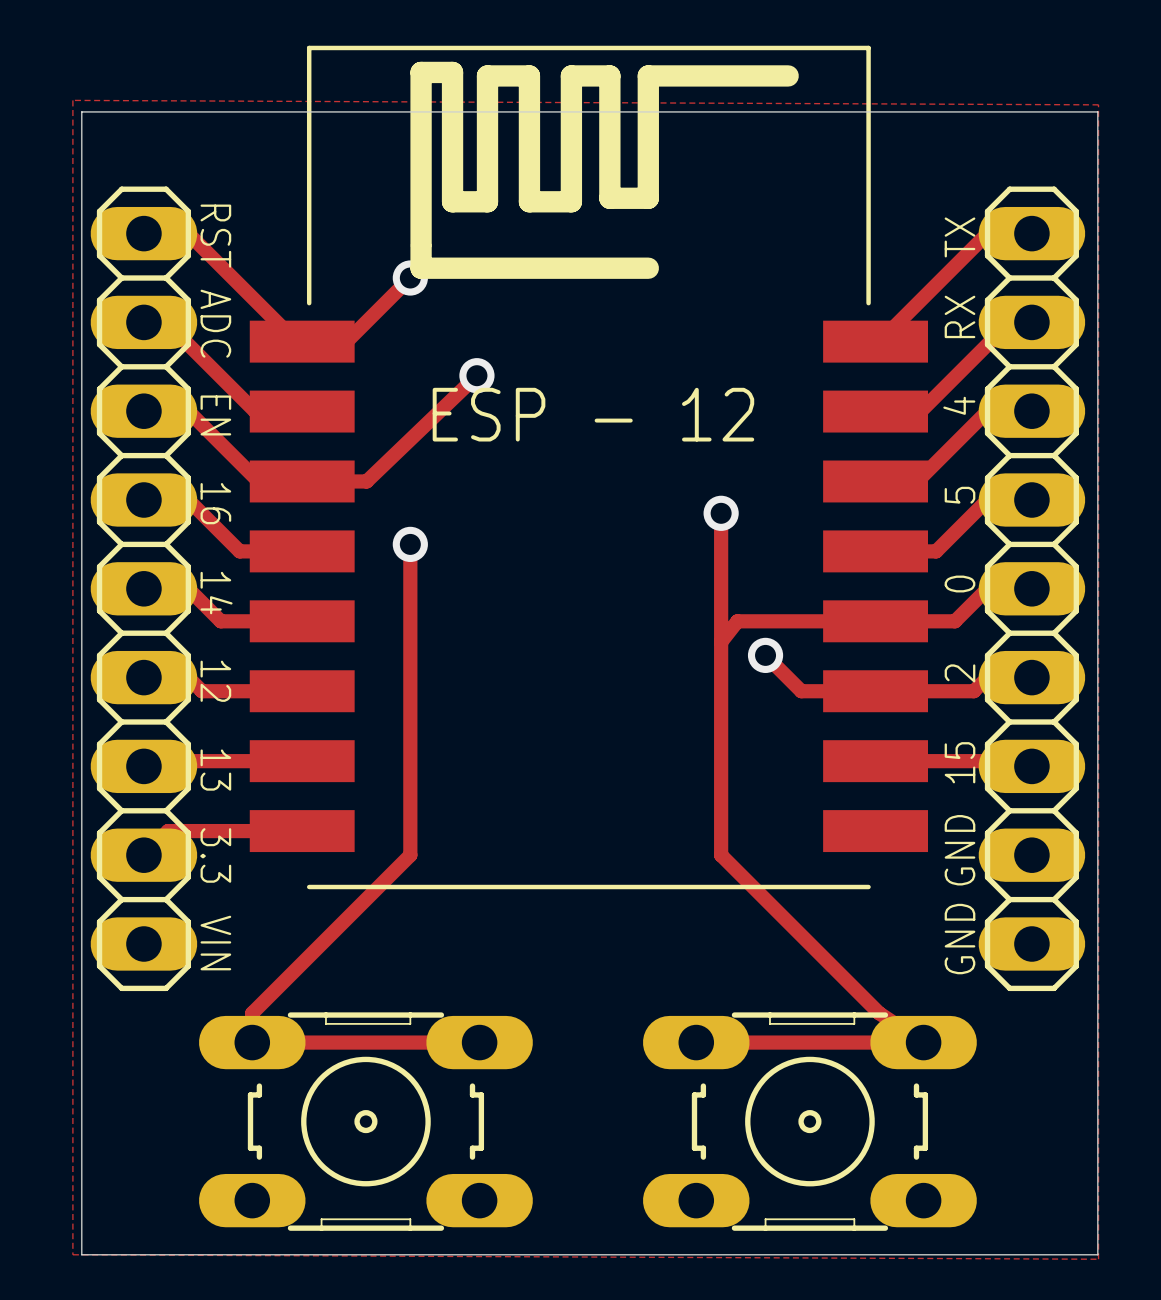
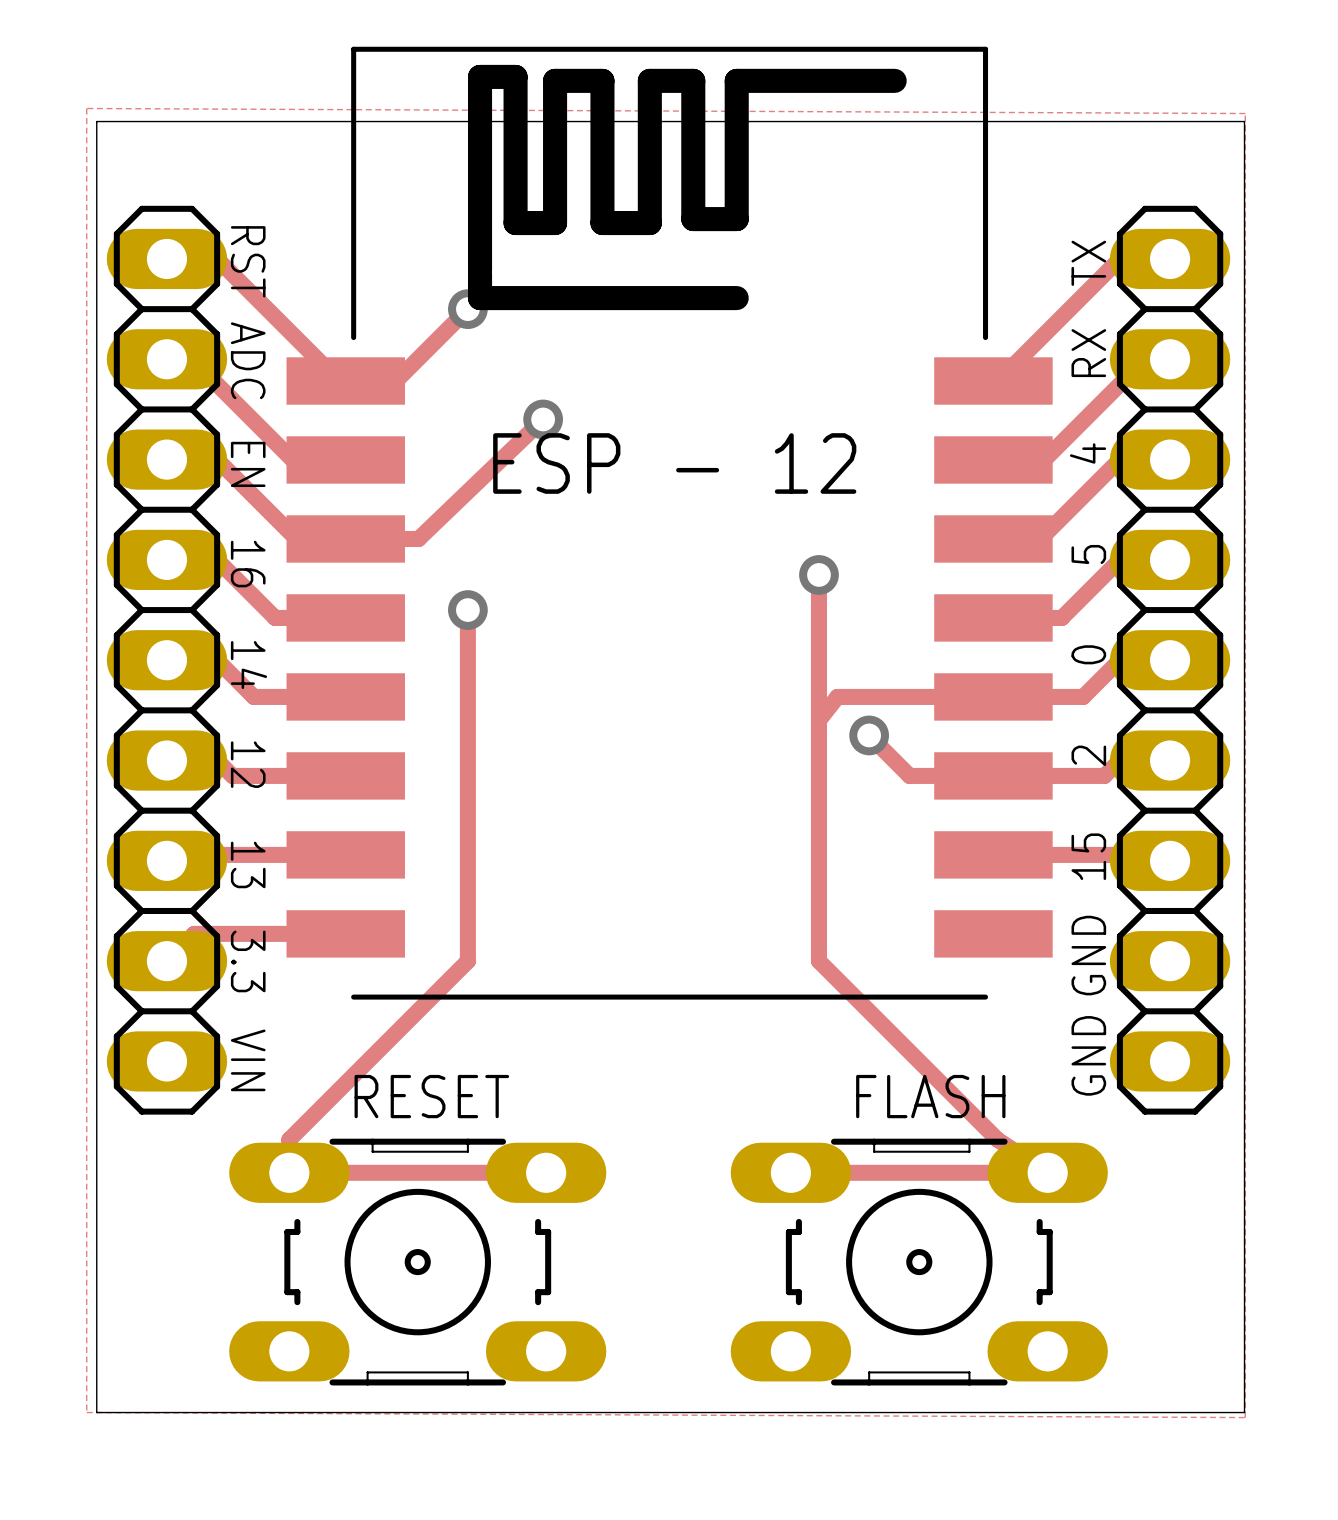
part value: none -> RESET (431, 1096)
part value: none -> FLASH (930, 1096)

